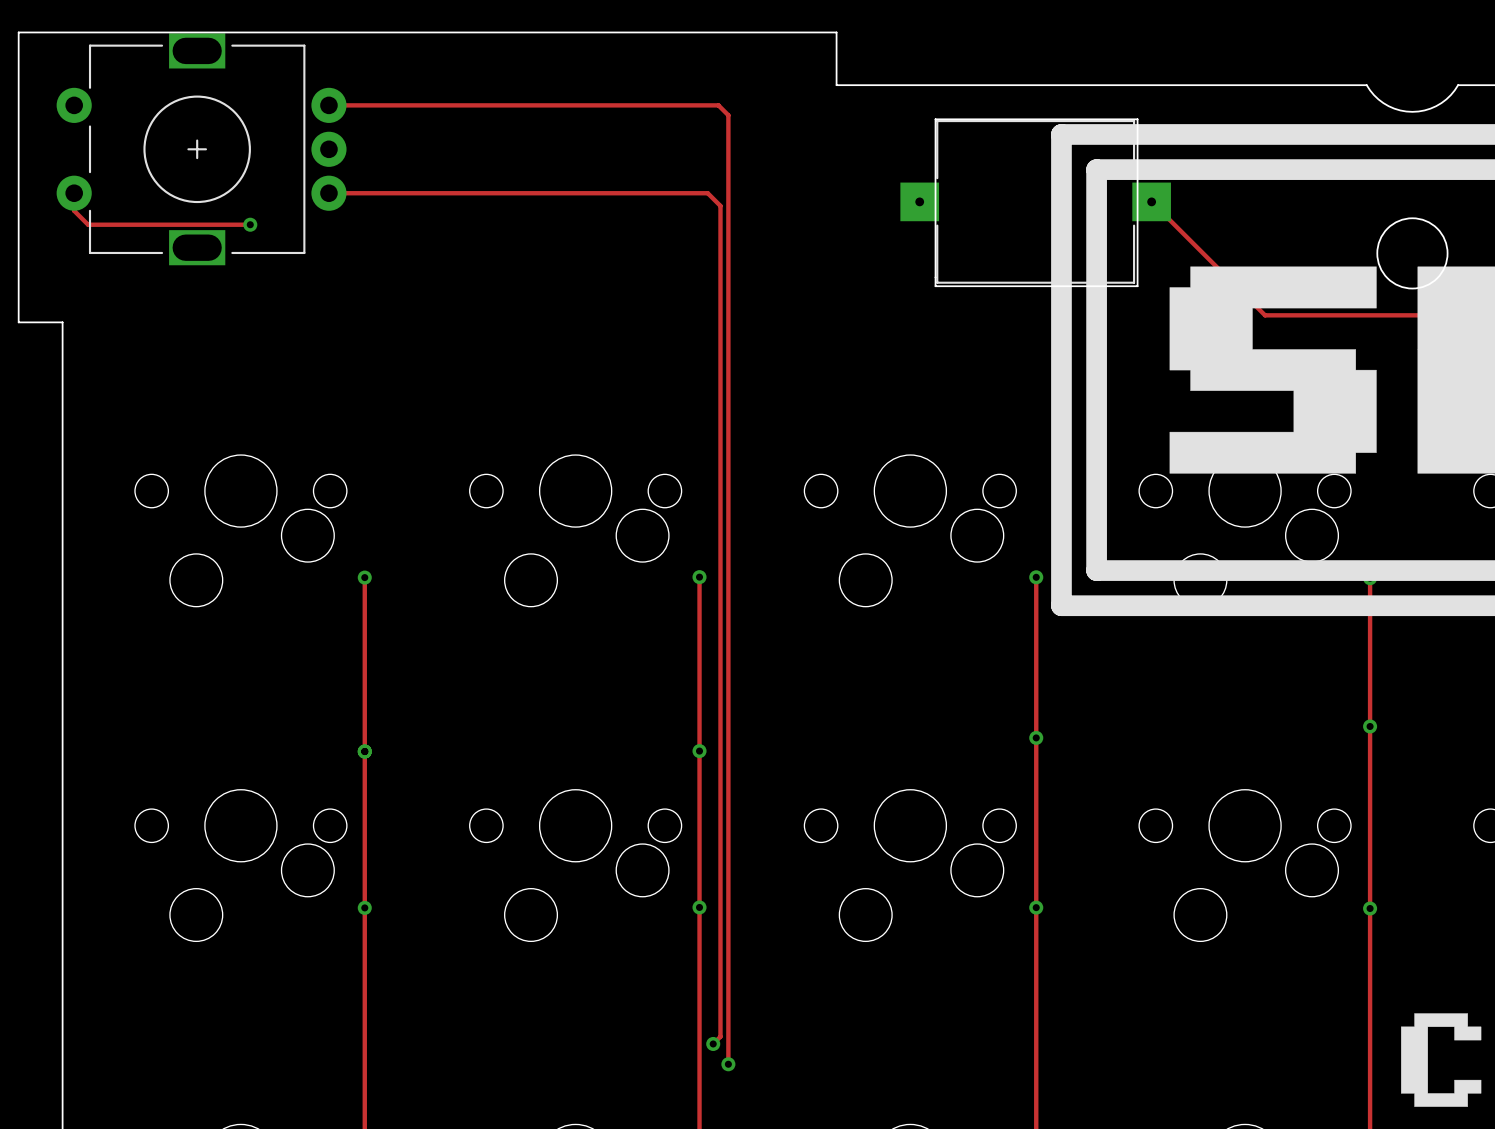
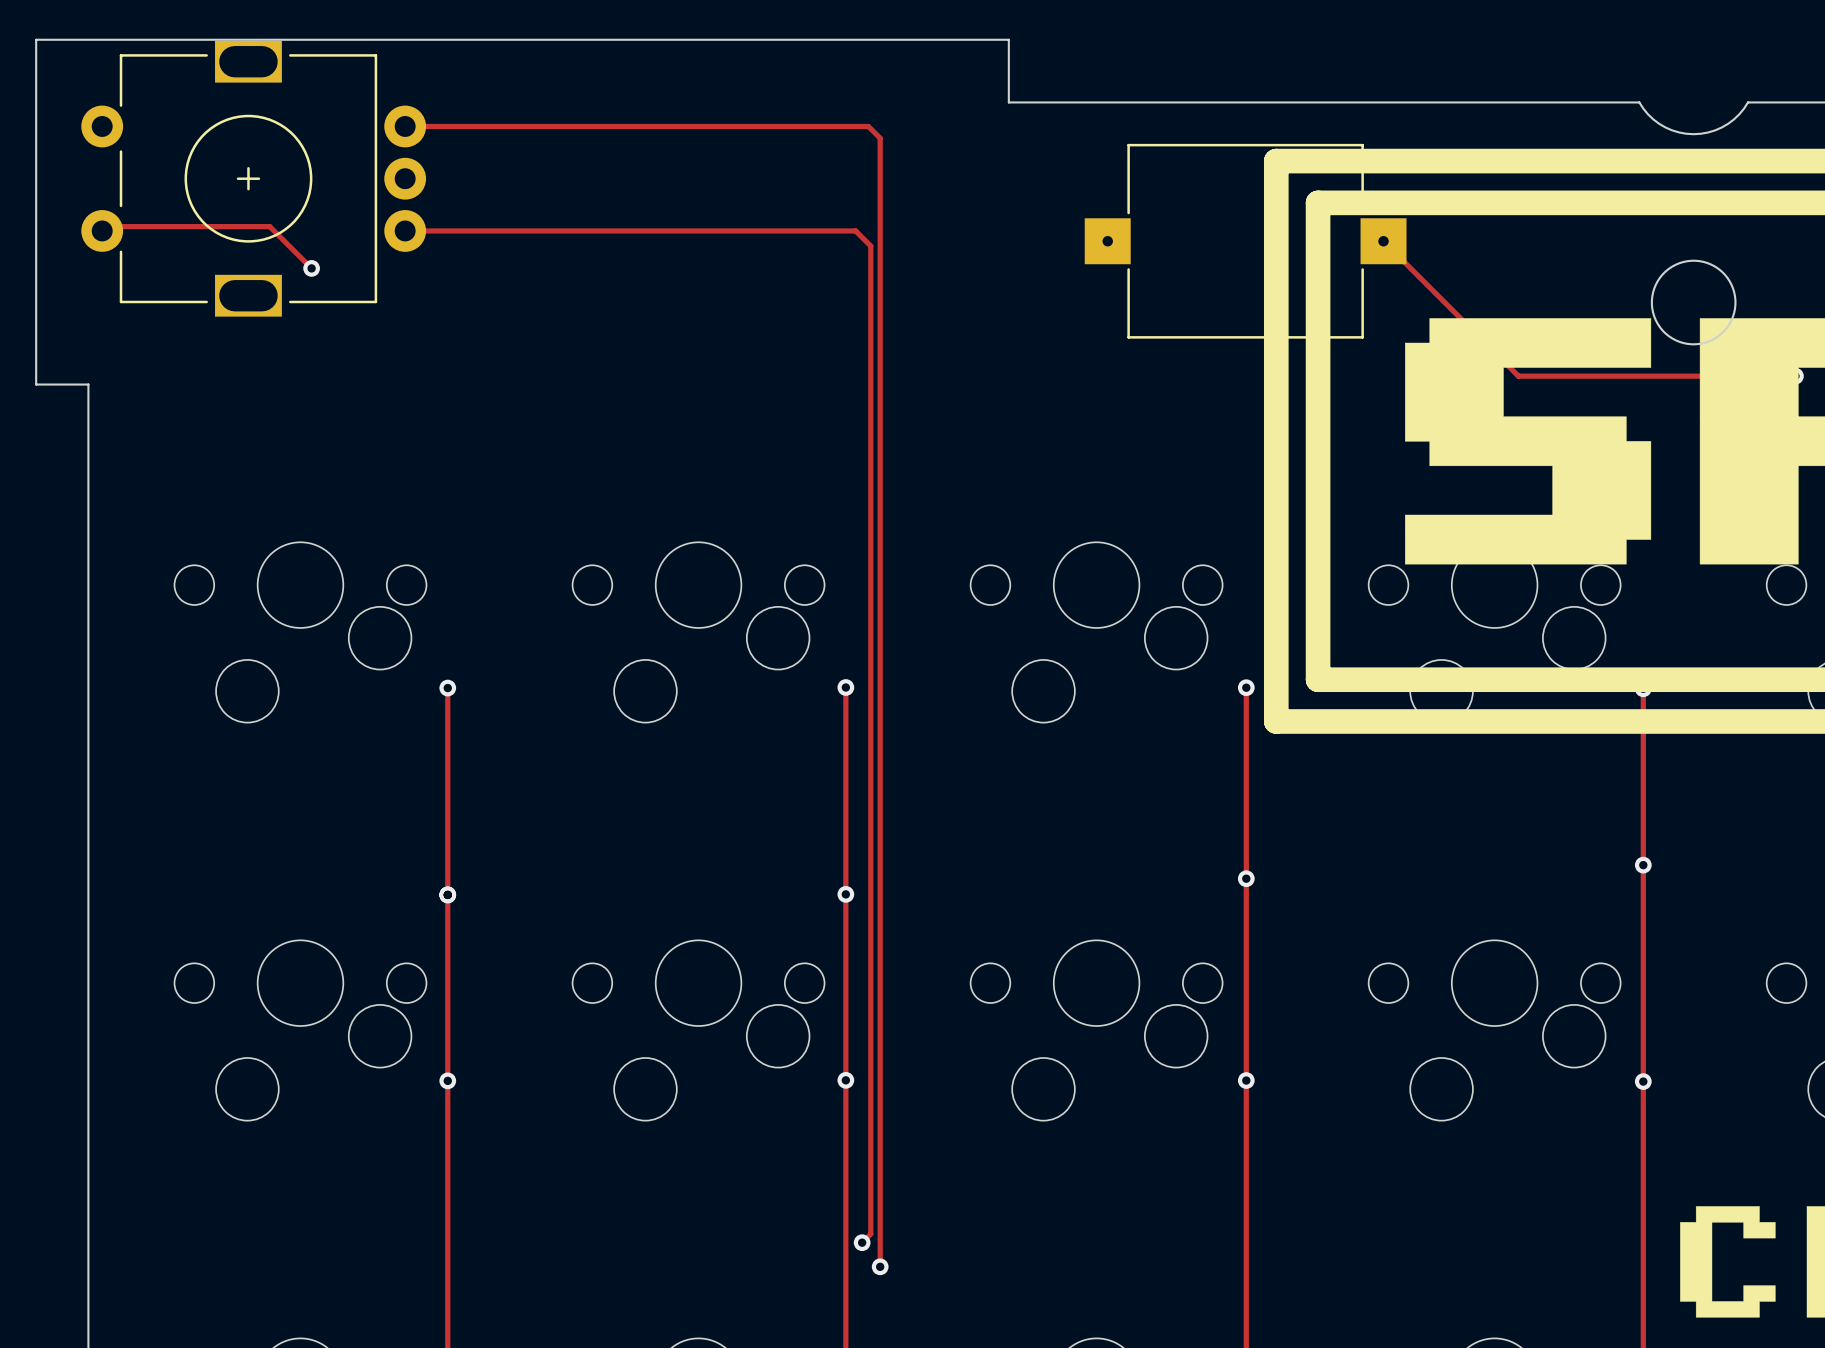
board edge: (935, 119) (935, 286) (1137, 286) (1137, 119) (935, 119) -> none
track: (74, 193) (74, 210) (88, 224) (250, 224) -> (102, 230) (106, 226) (269, 226) (311, 268)

